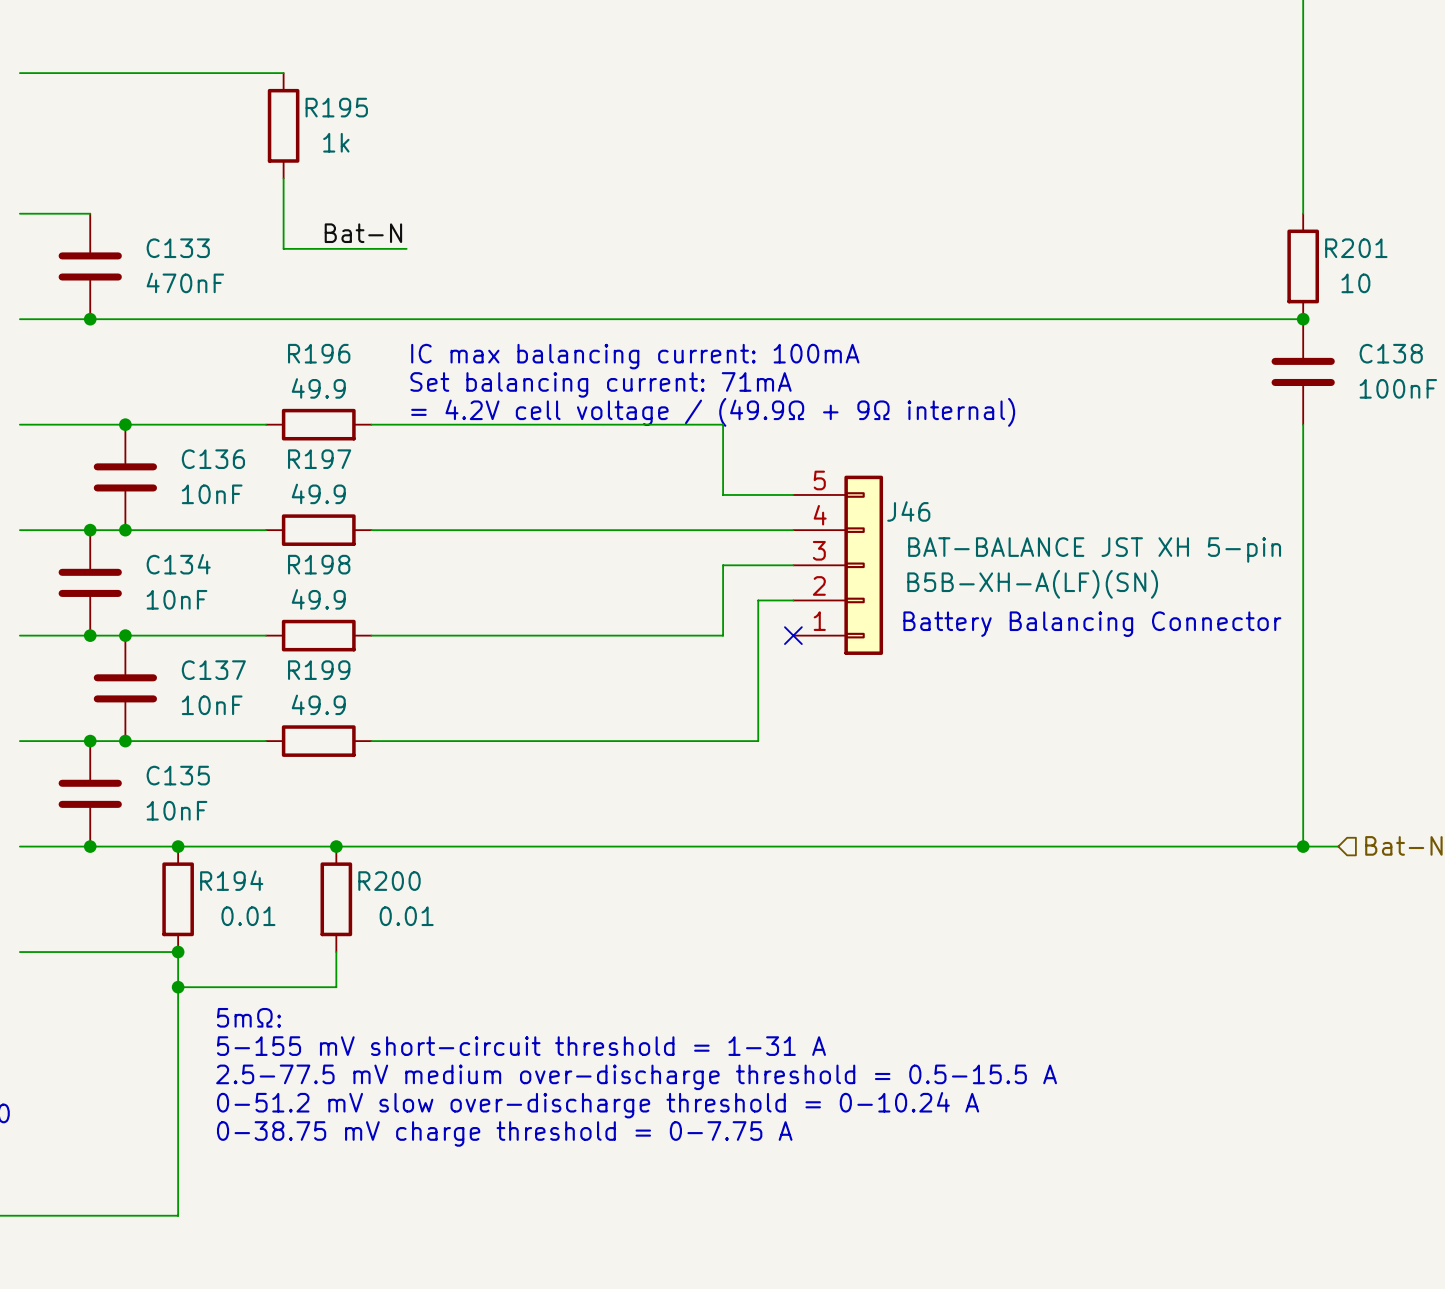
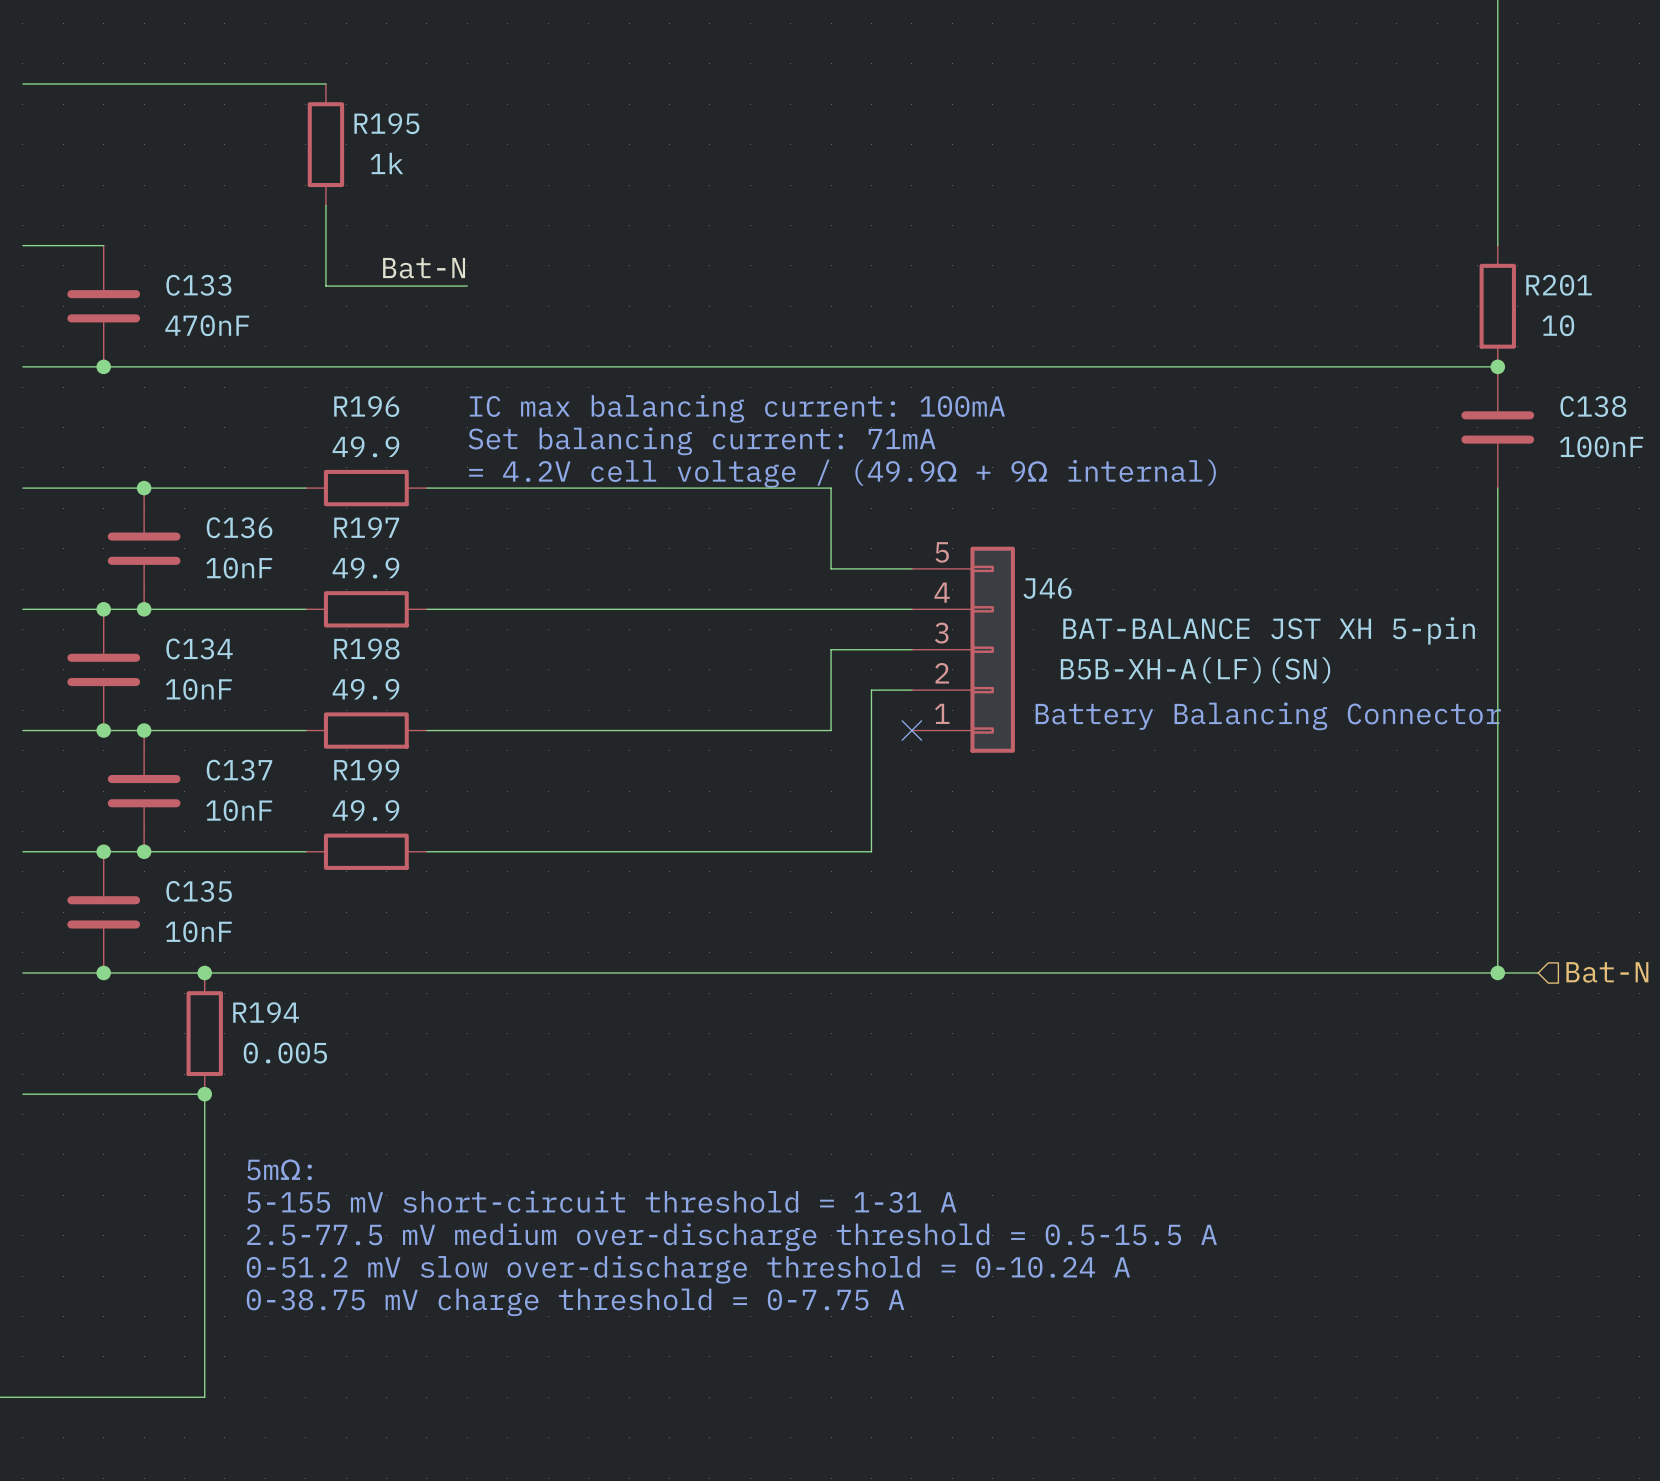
junction: (336, 846) -> none
R200: 0.01 (336, 899) -> none
R194 value: 0.01 (248, 916) -> 0.005 (285, 1053)
wire: (336, 952) (336, 987) (178, 987) -> none
junction: (178, 987) -> none

